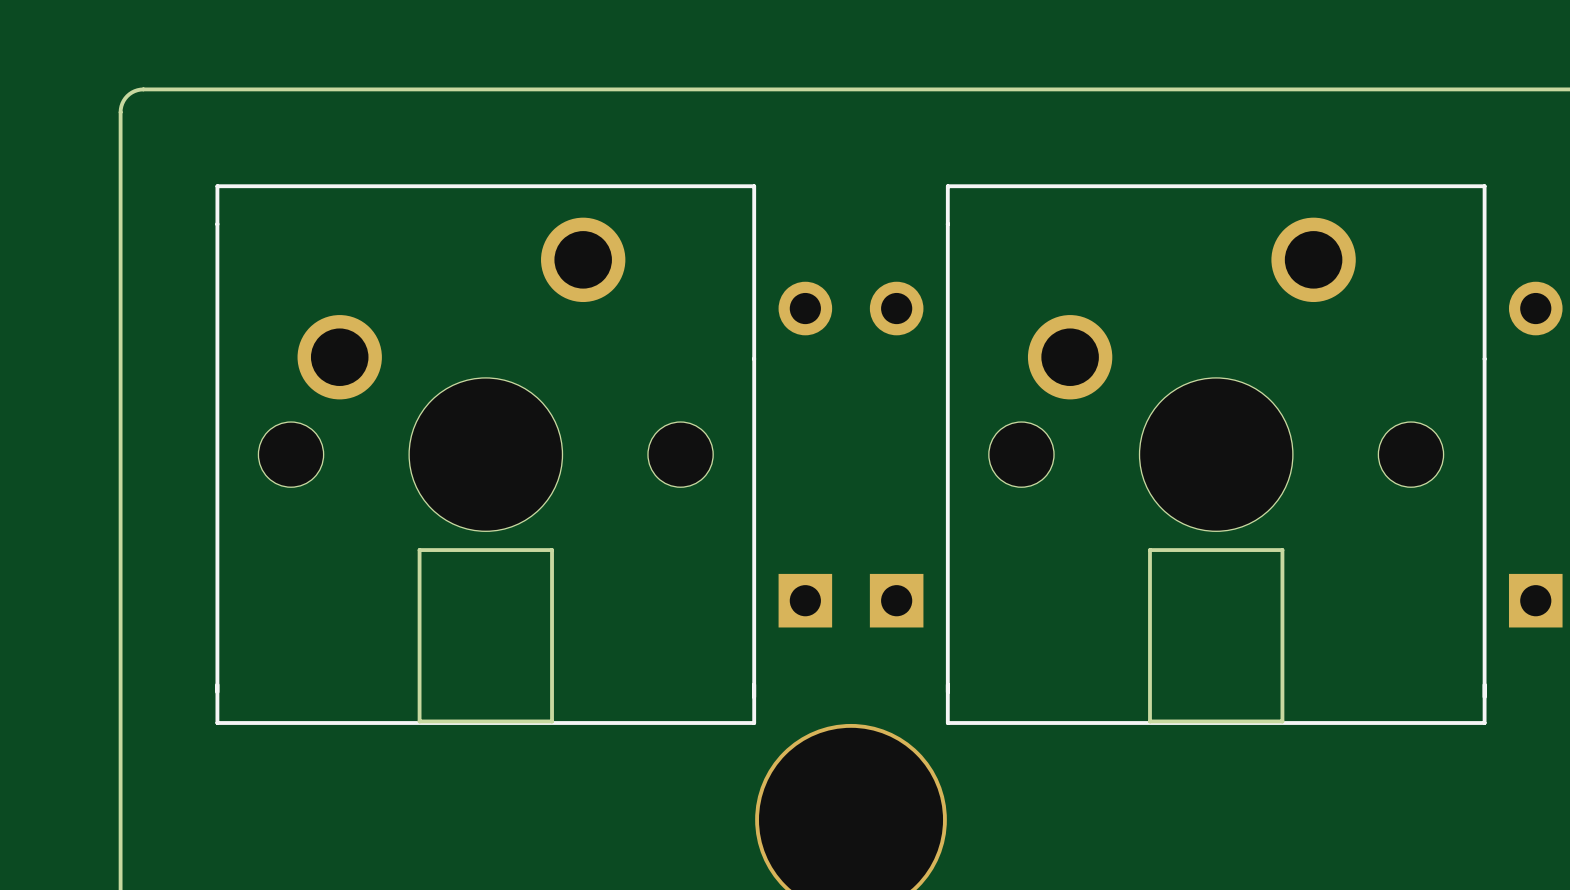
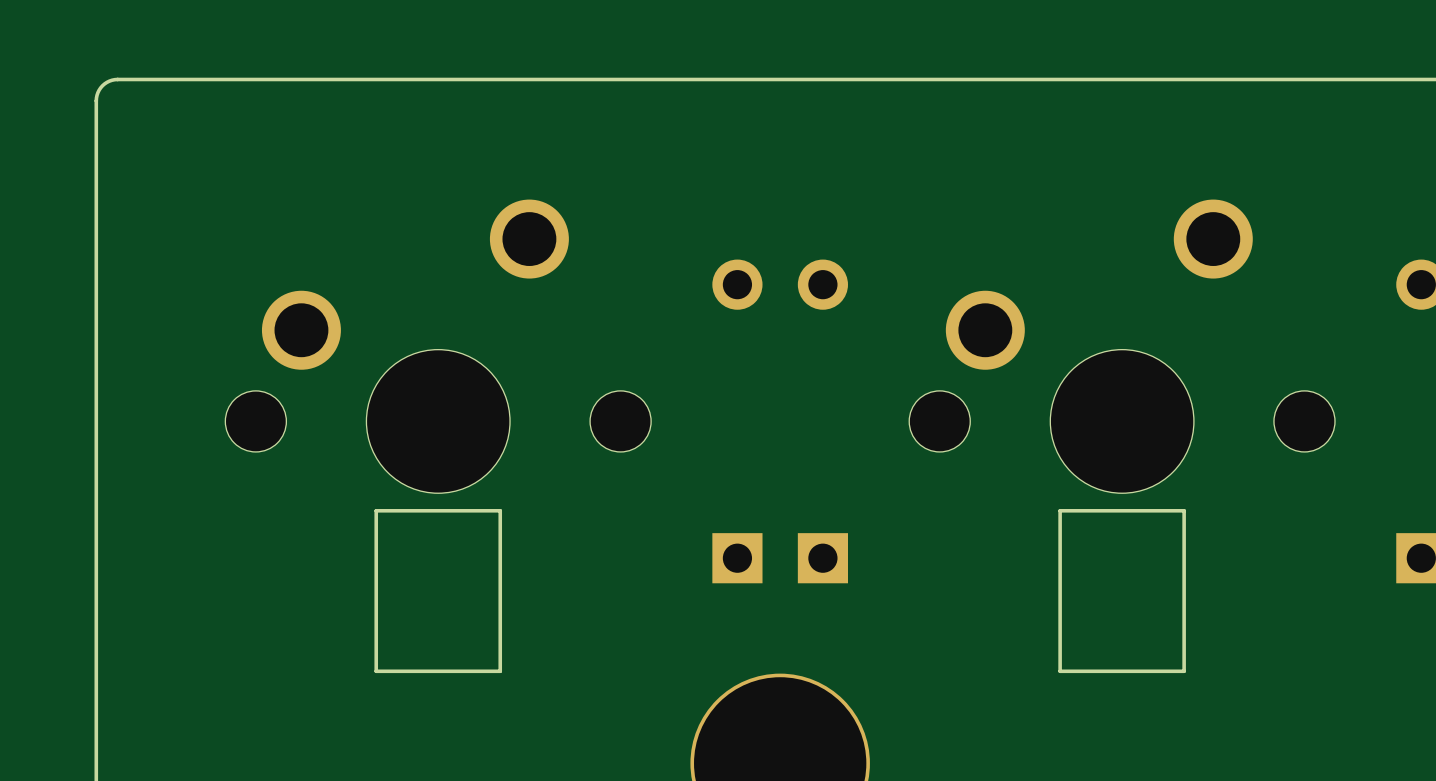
part: (485, 454) -> none
part: (1216, 454) -> none

